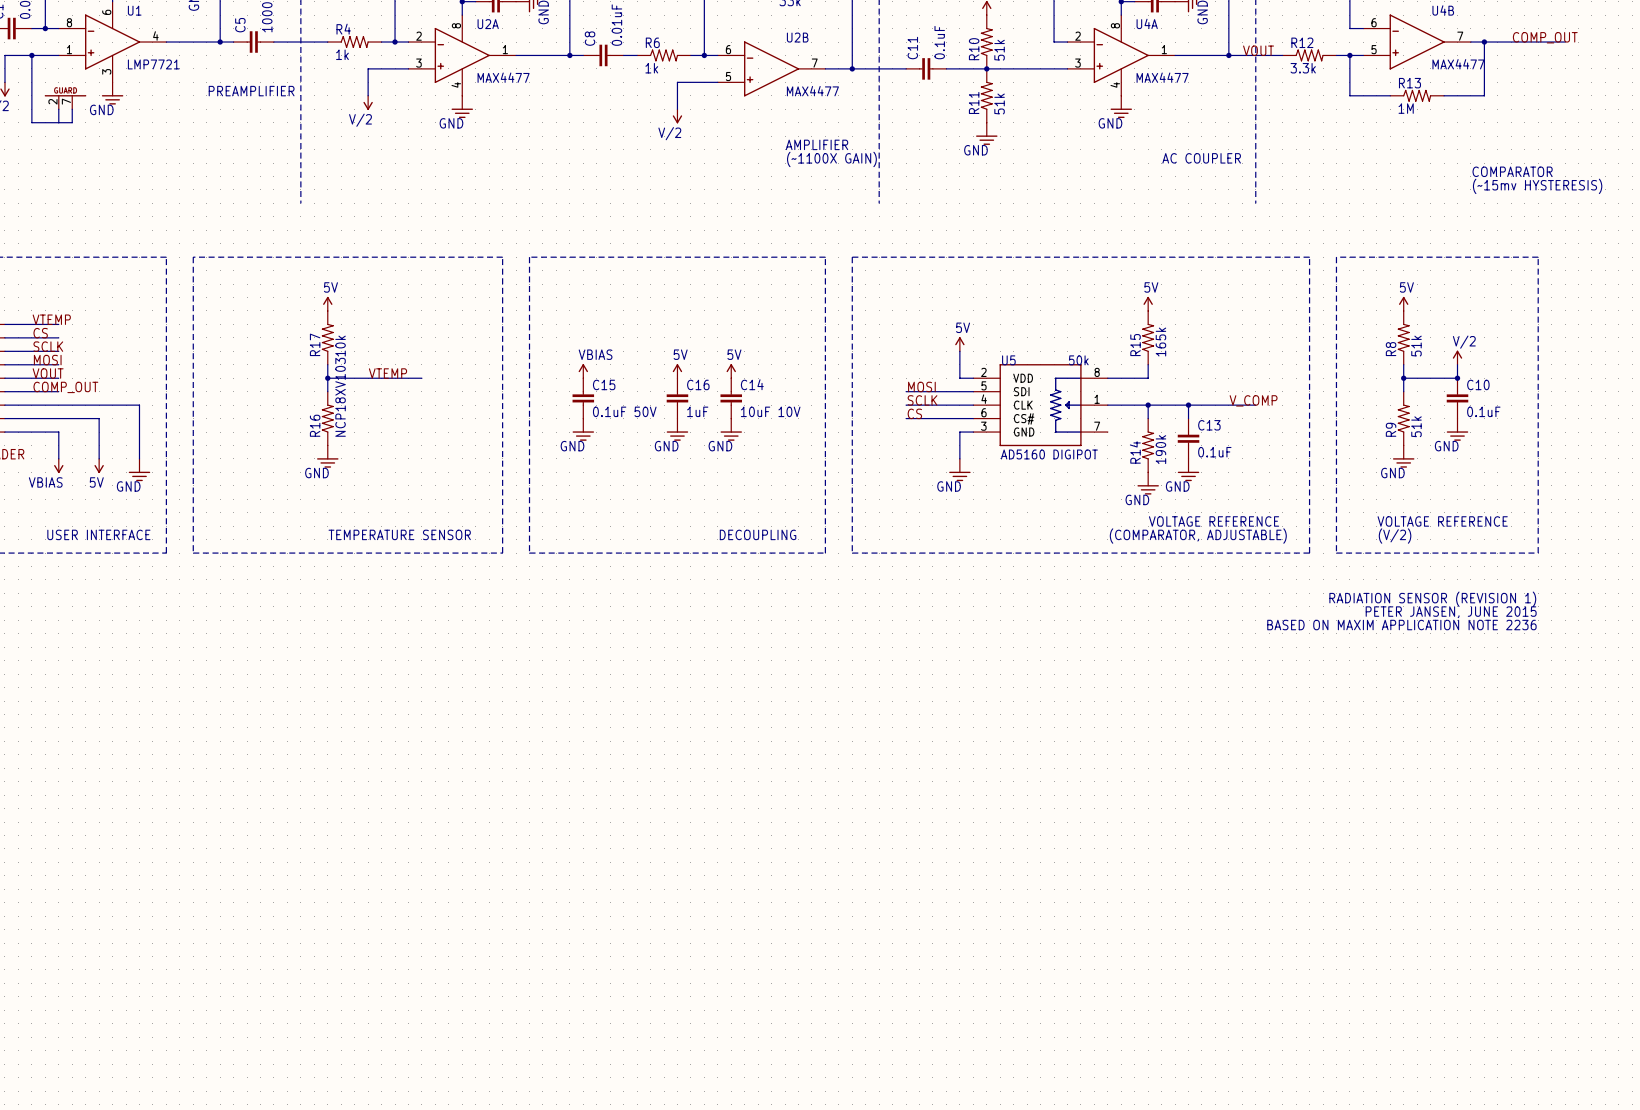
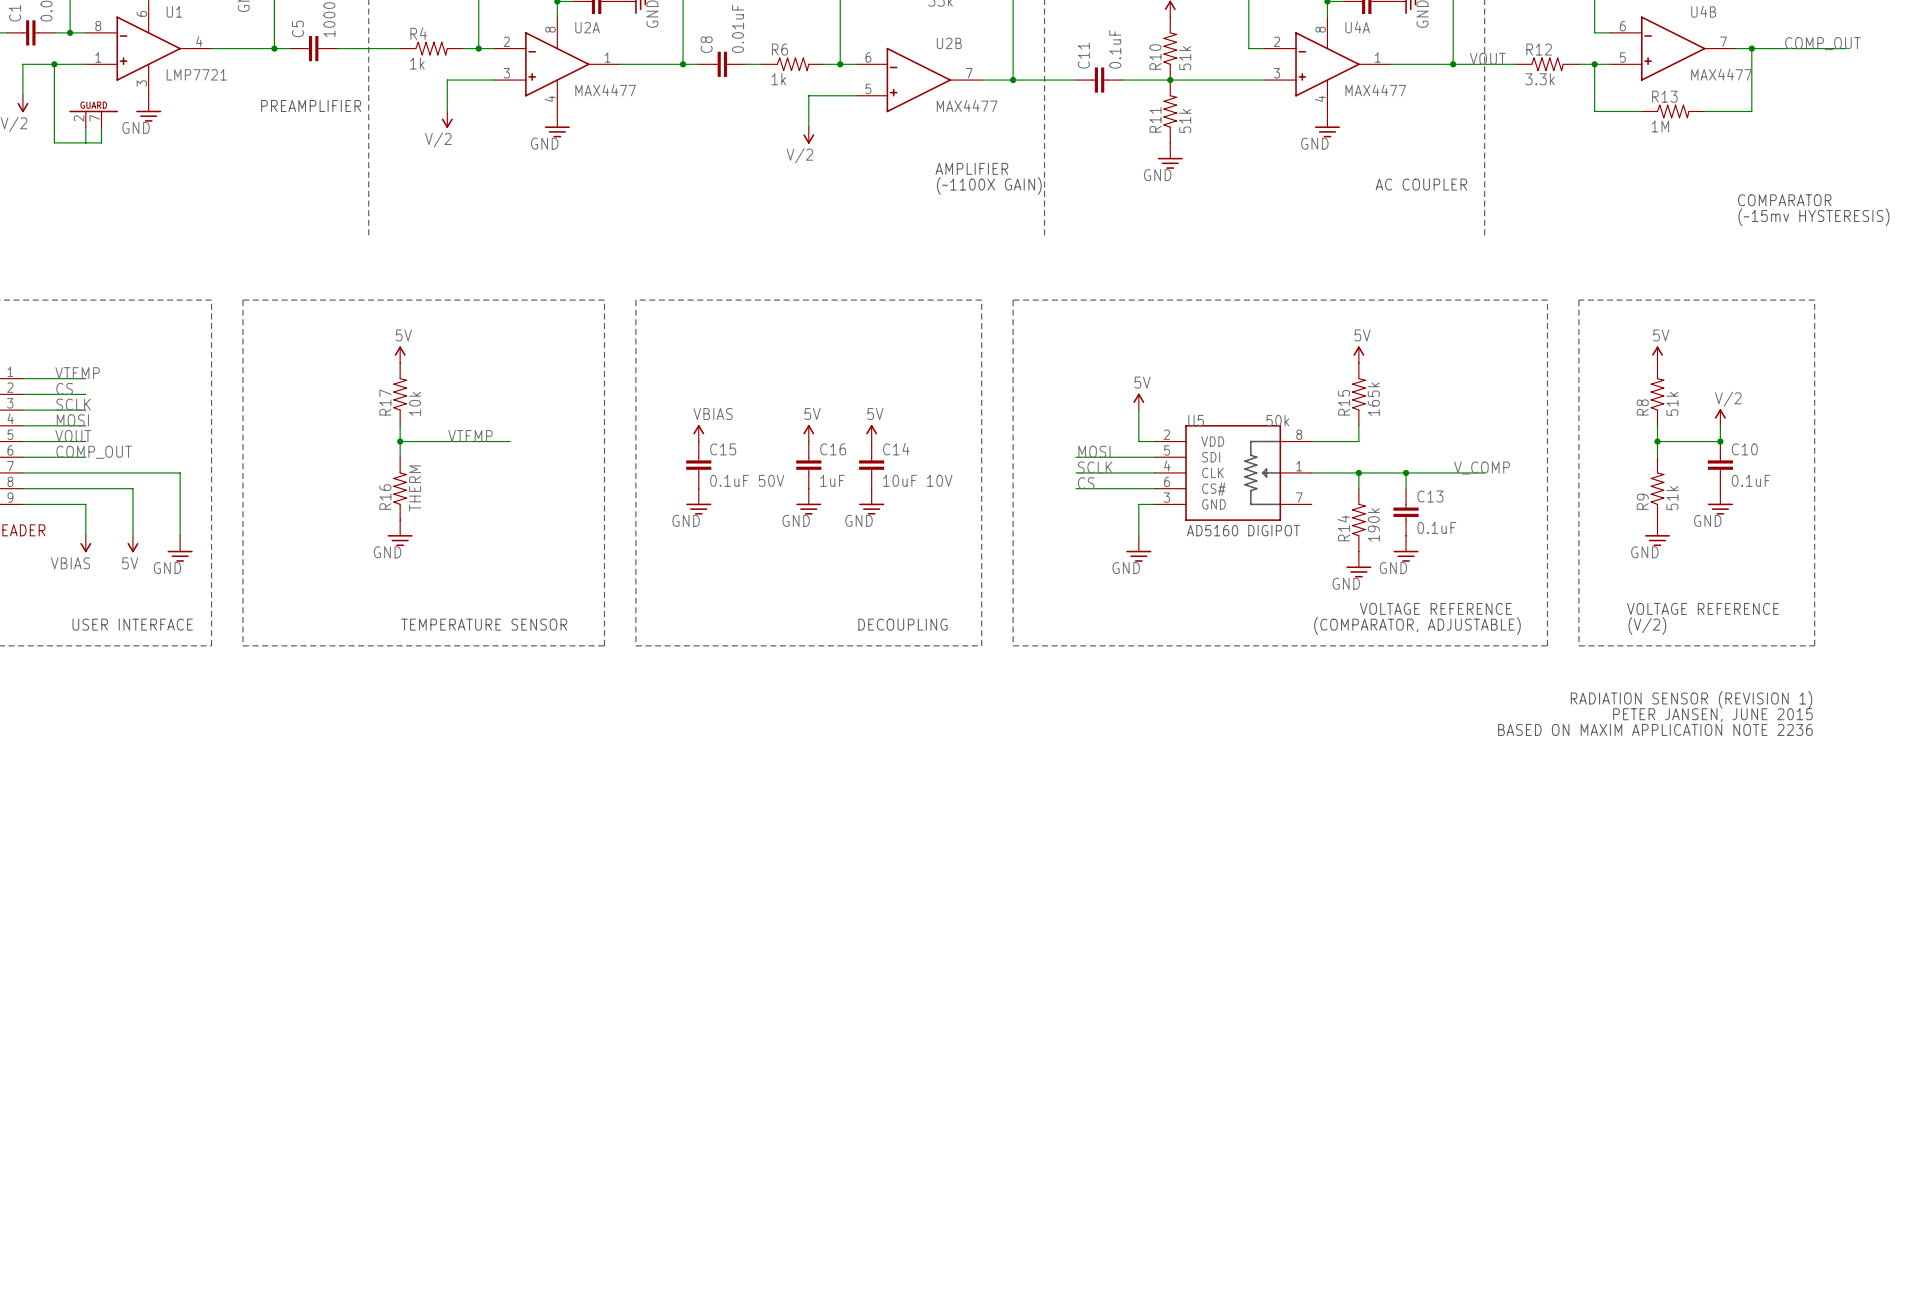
R16 value: NCP18XV103 (340, 397) -> THERM (415, 488)

